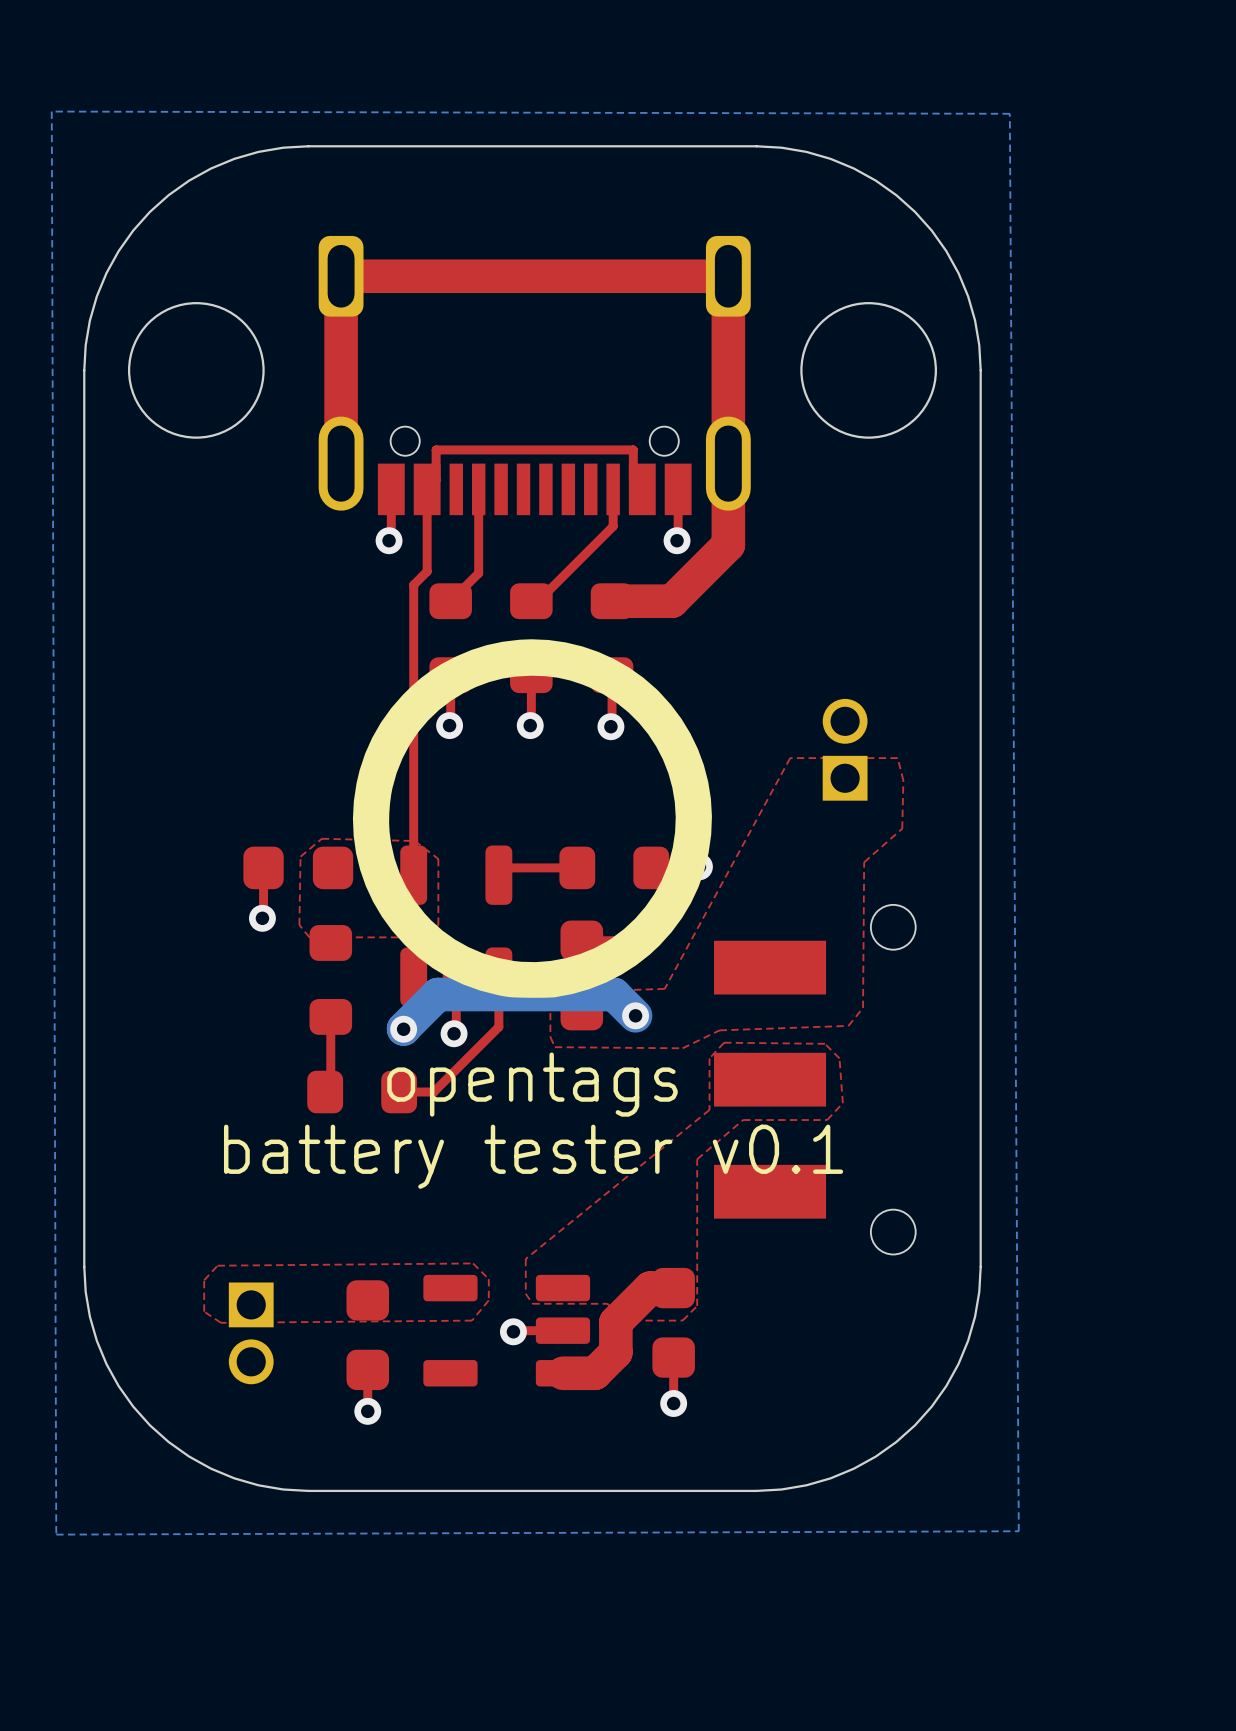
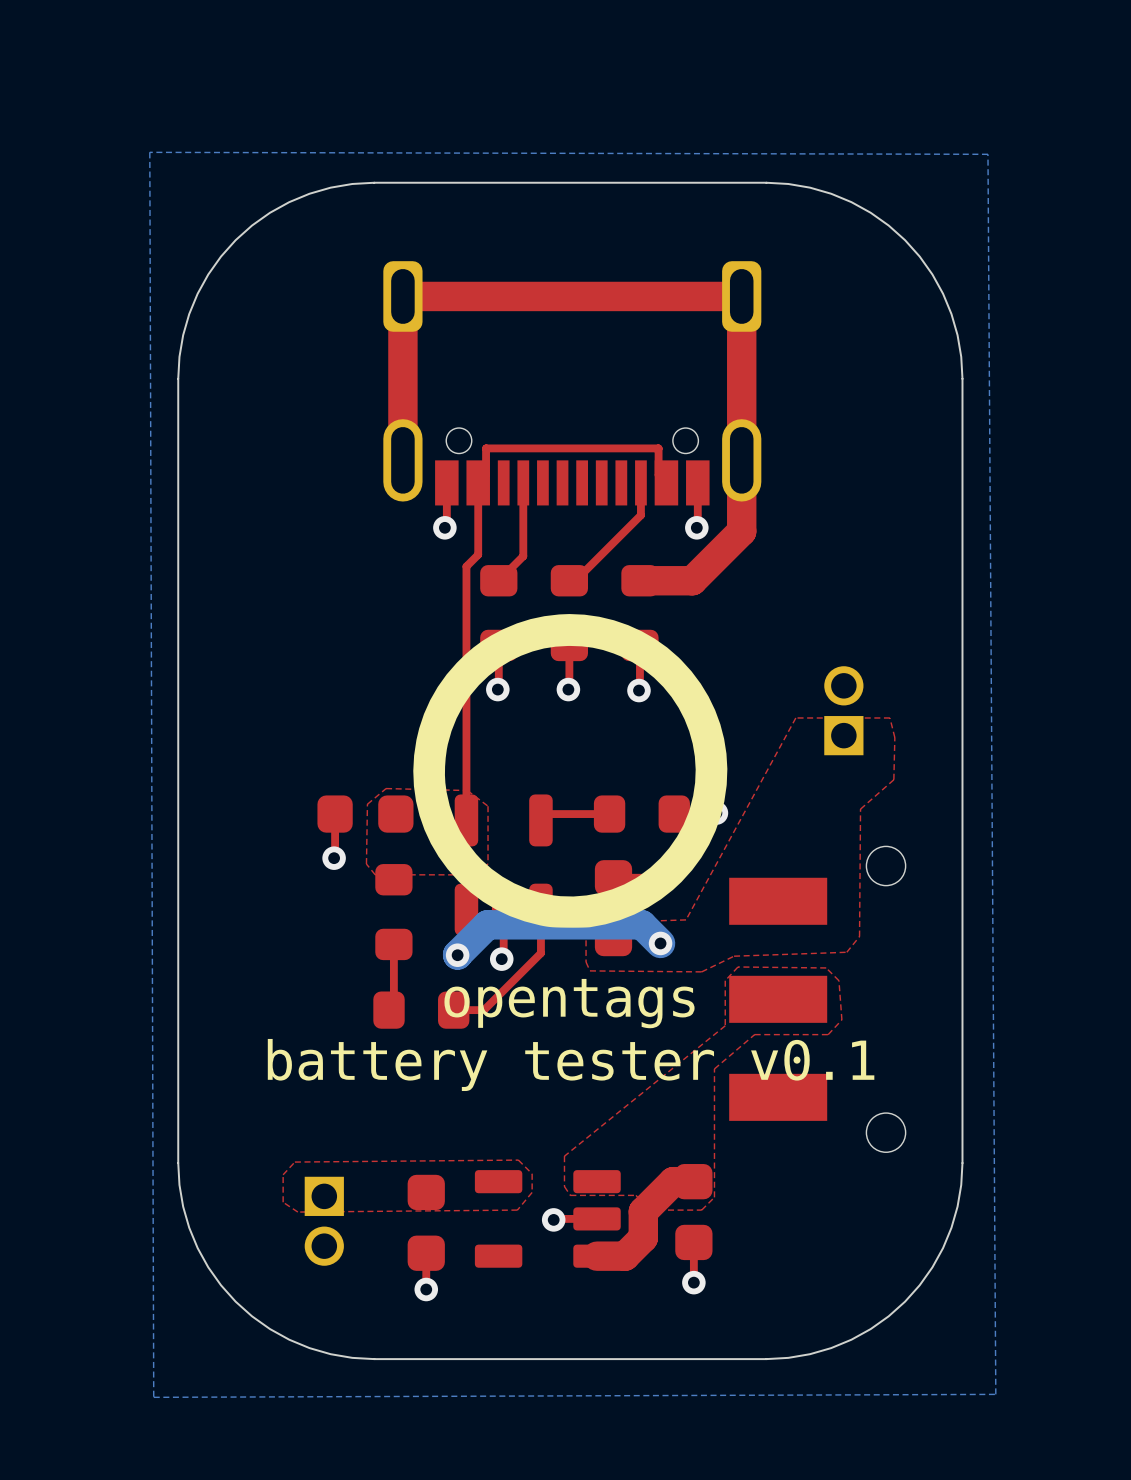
round board edge: [127, 302, 265, 439] -> none
round board edge: [800, 302, 937, 439] -> none

